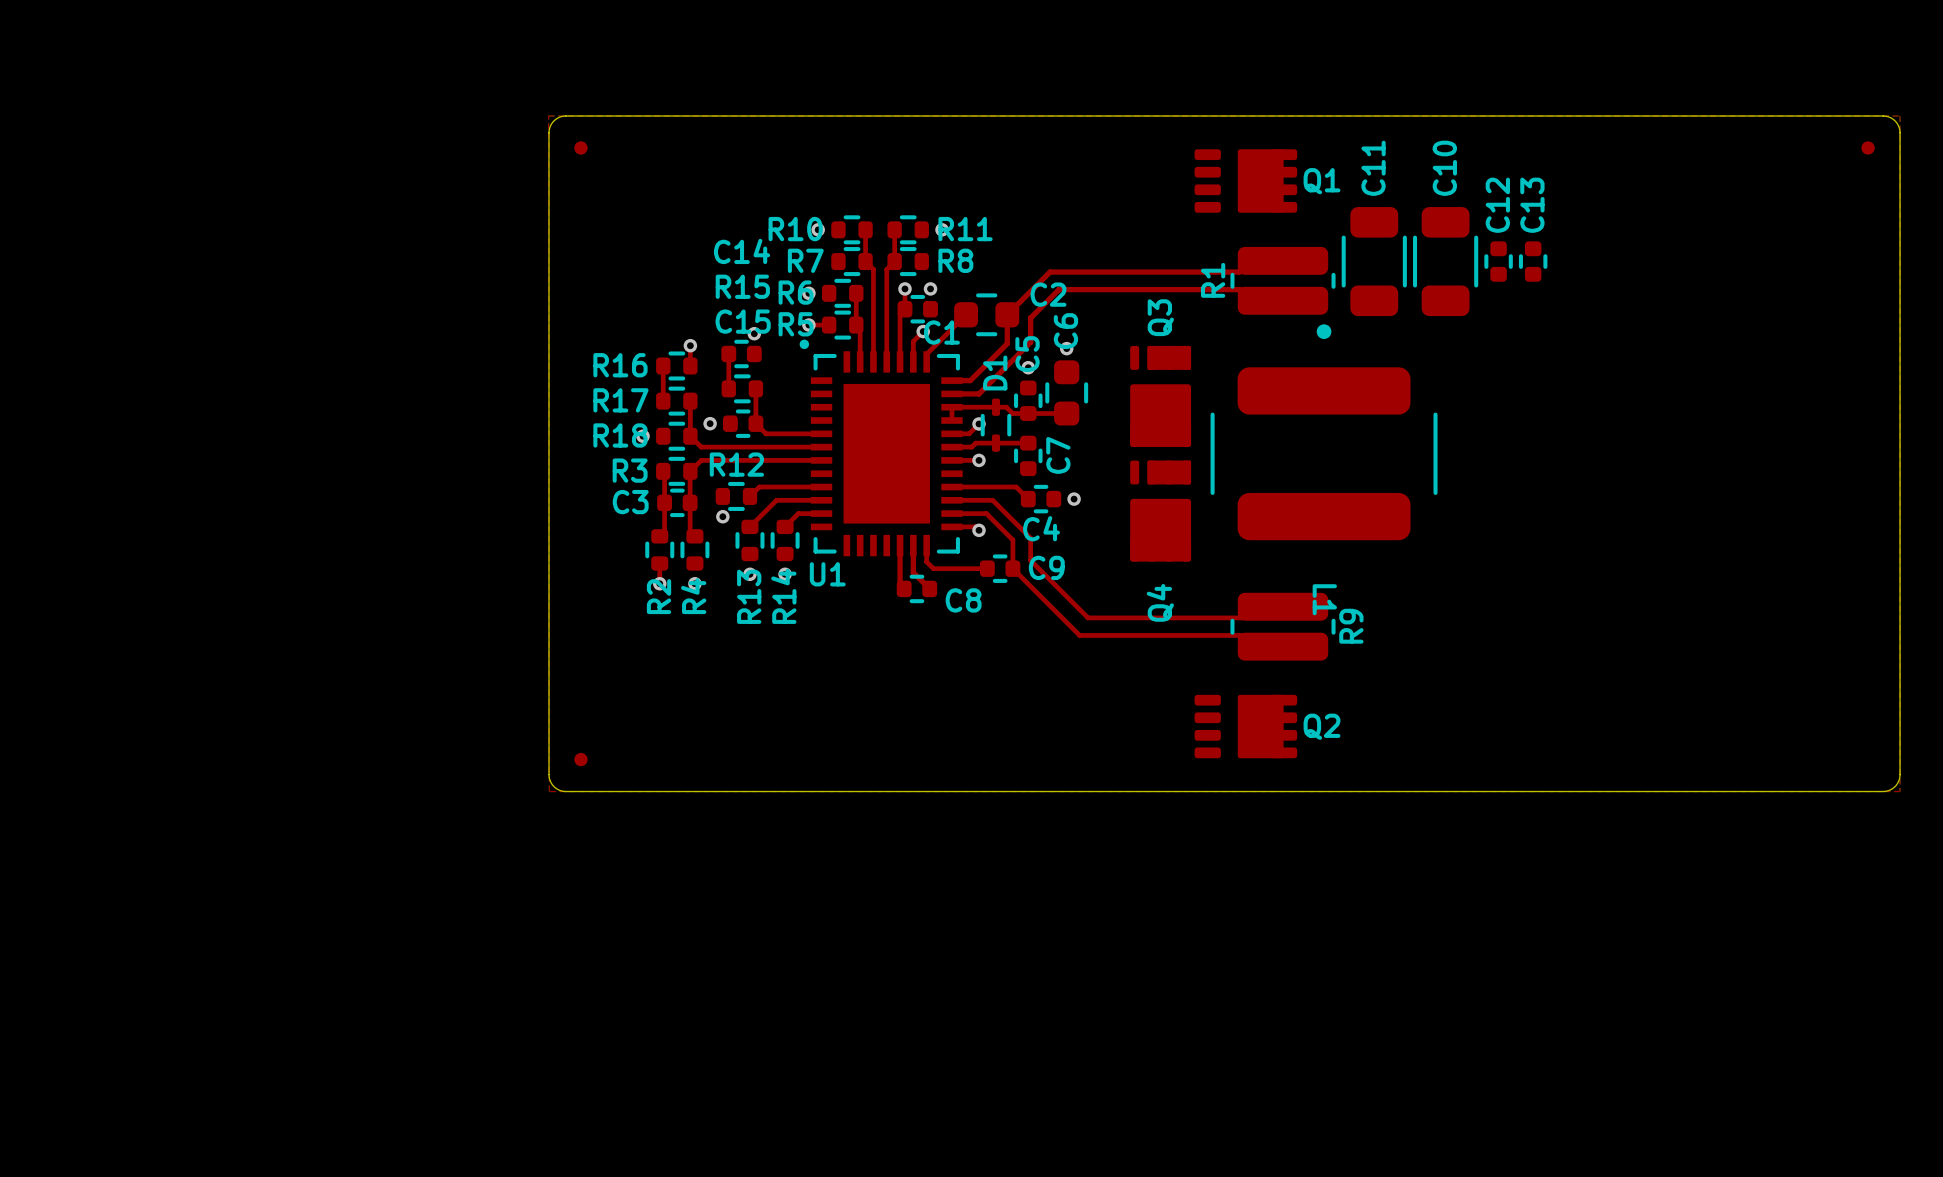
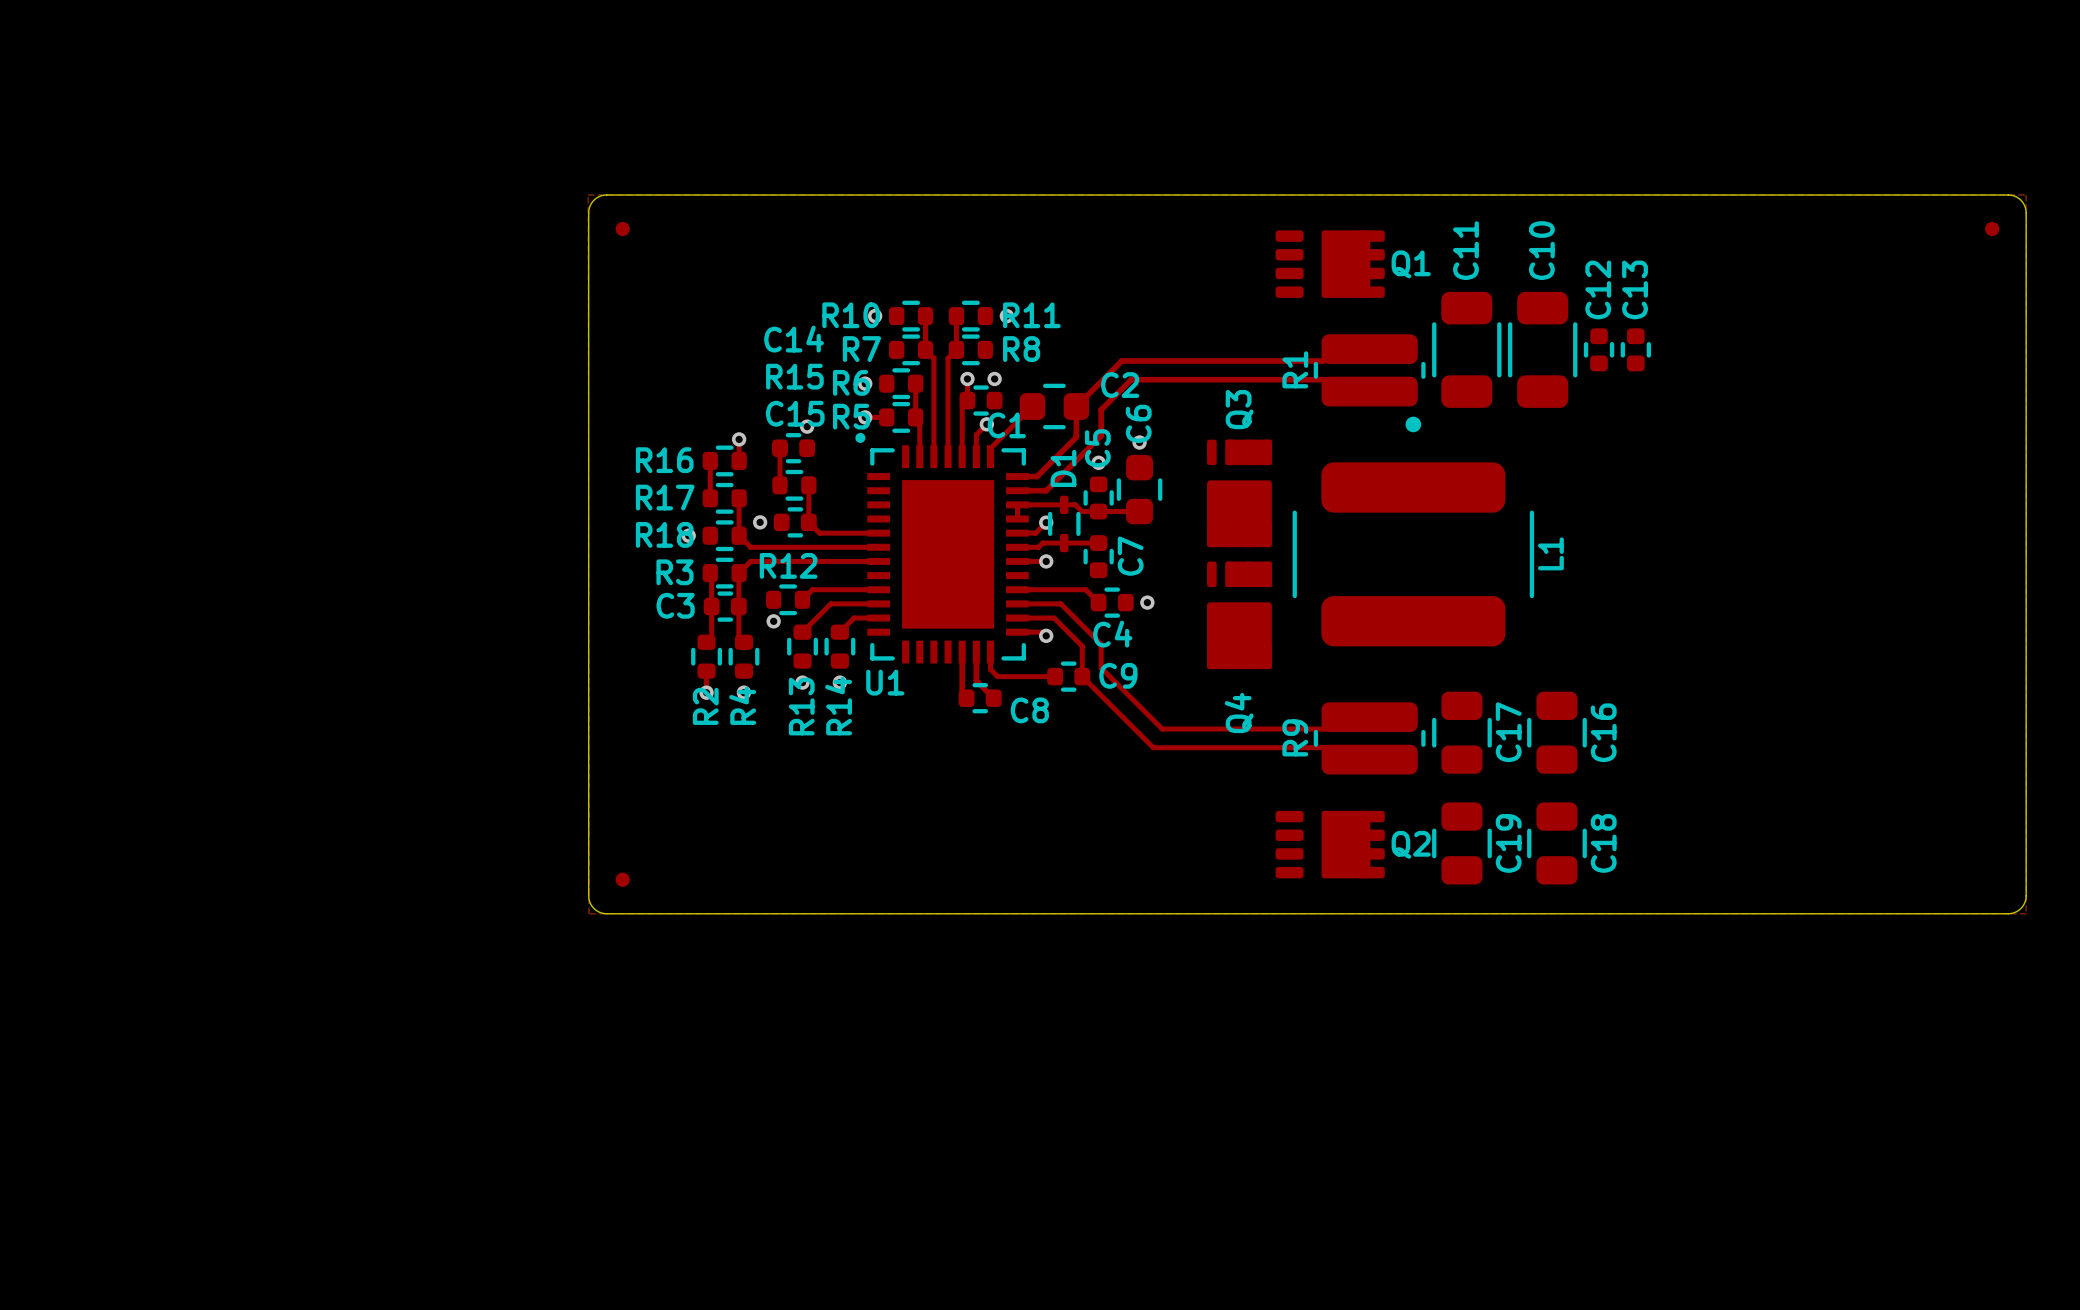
L1 name rotation: 0° (1324, 599) -> 180° (1550, 553)
L1 name position: L1 (1324, 599) -> L1 (1550, 553)
C17: none -> (1461, 732)
C16: none -> (1556, 732)
R9 name position: R9 (1351, 626) -> R9 (1295, 737)
C19: none -> (1461, 843)
C18: none -> (1556, 843)

